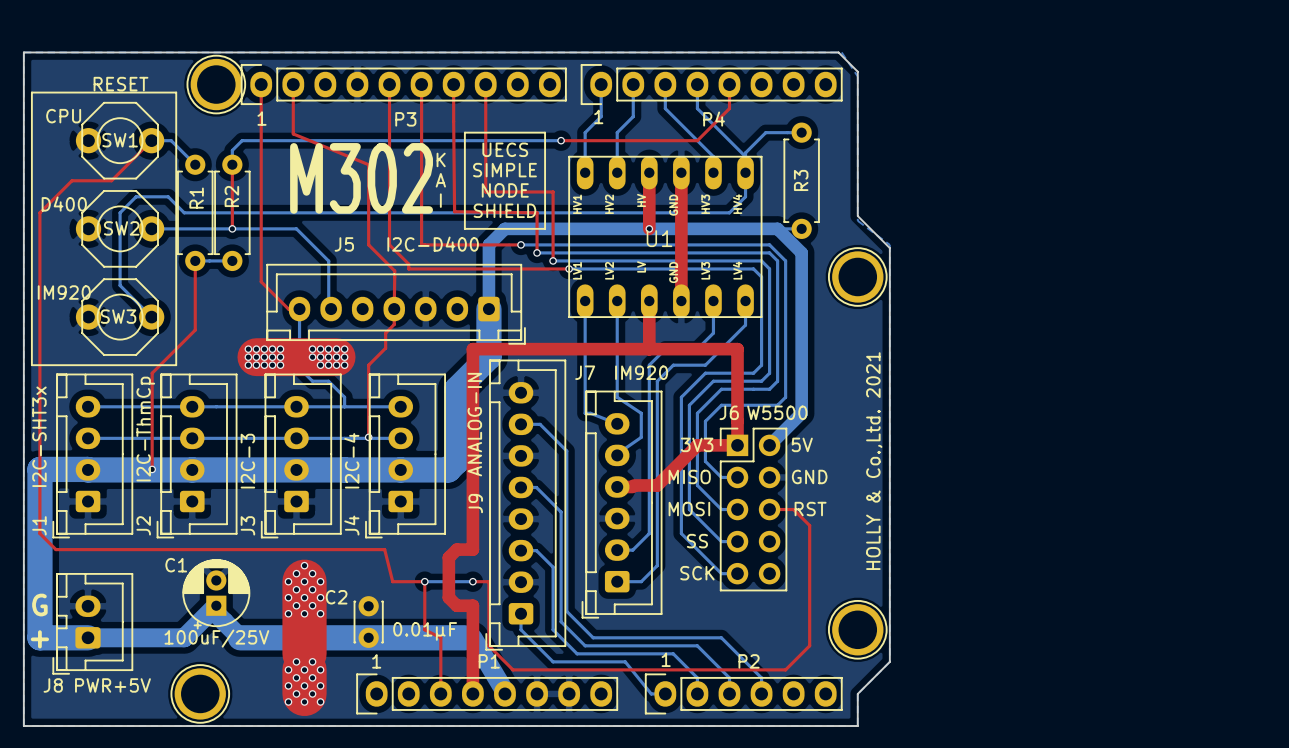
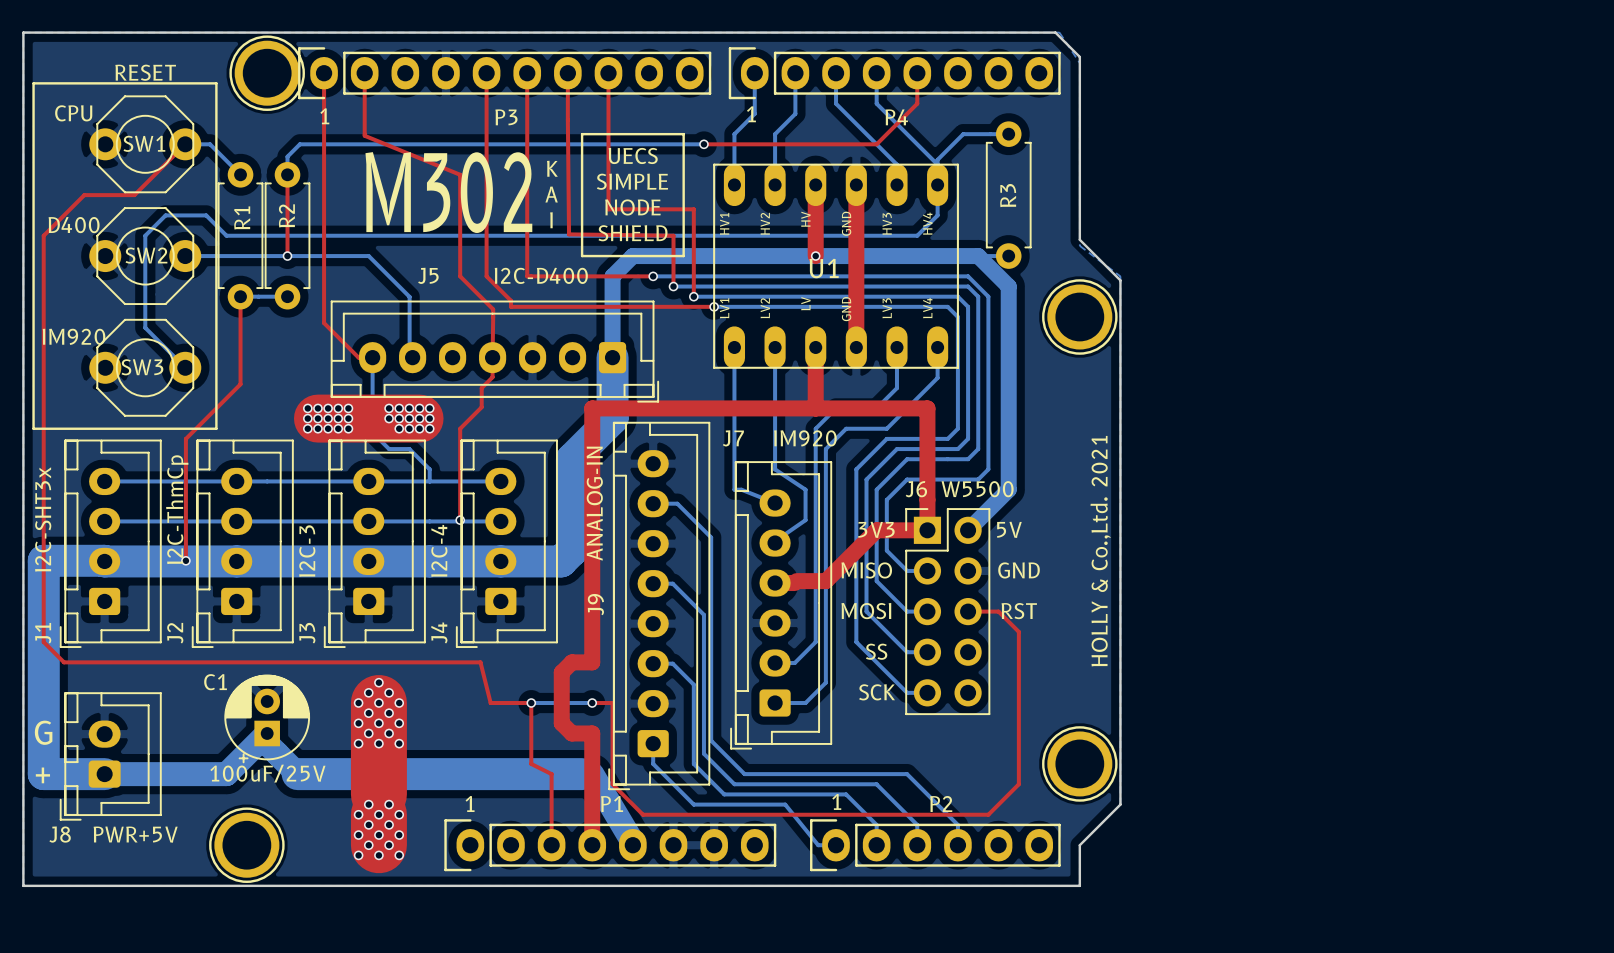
C2: 0.01μF (368, 622) -> none

